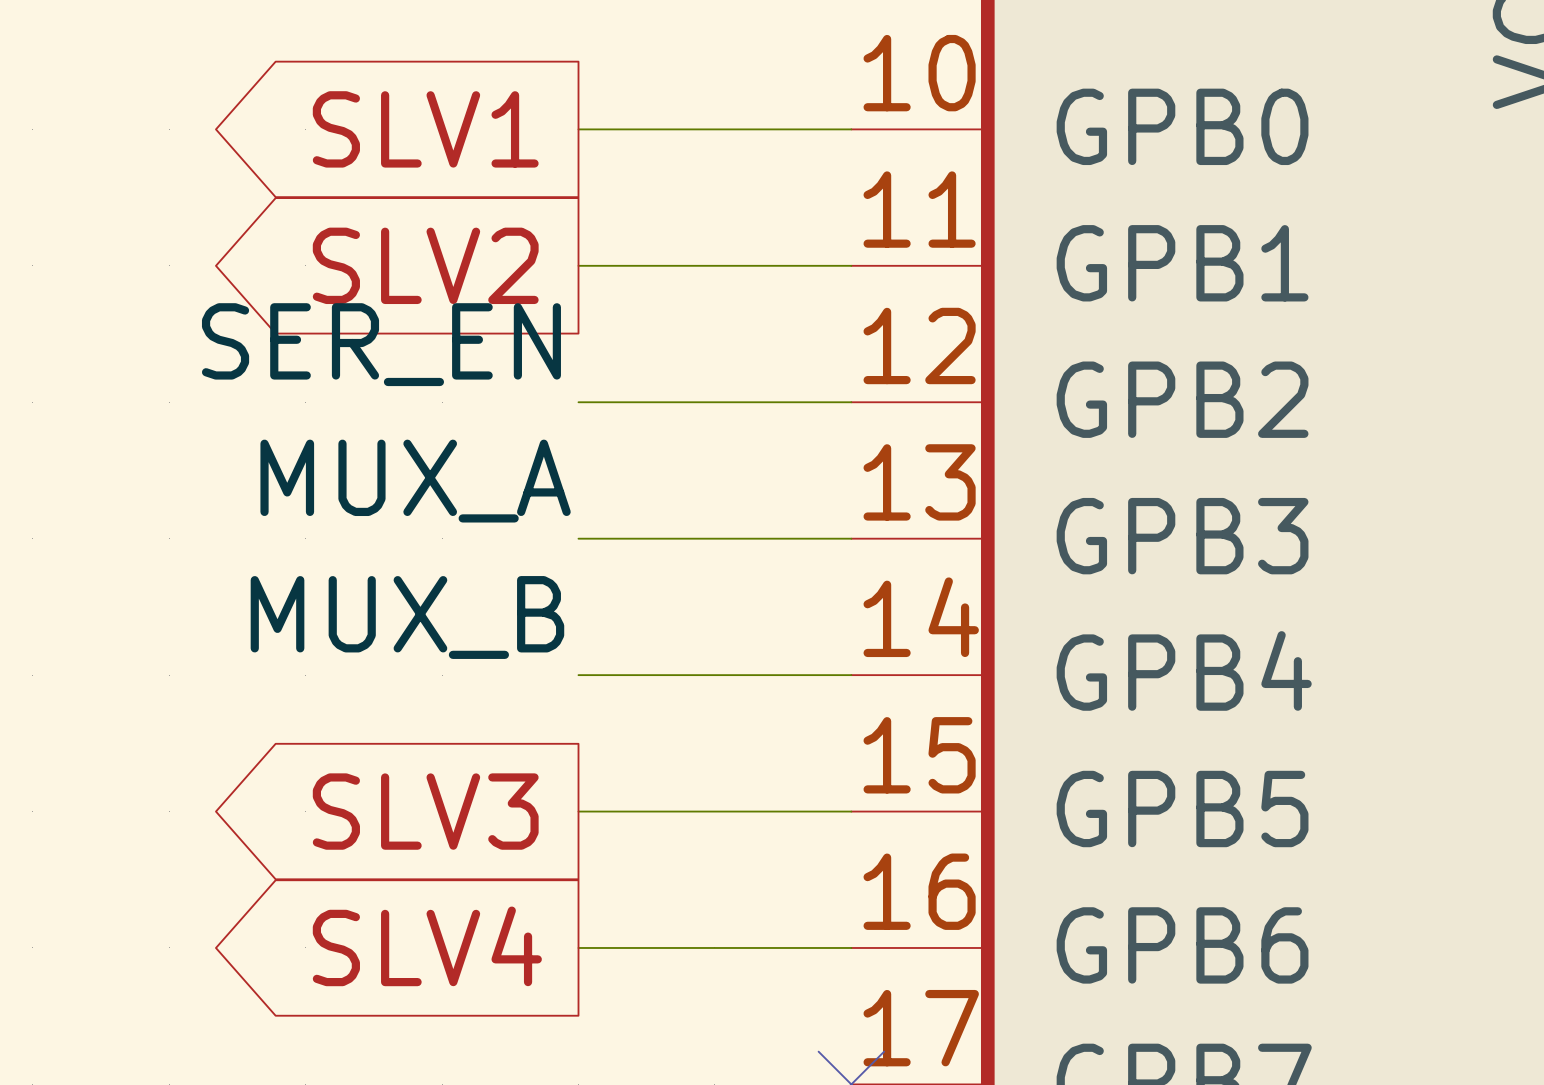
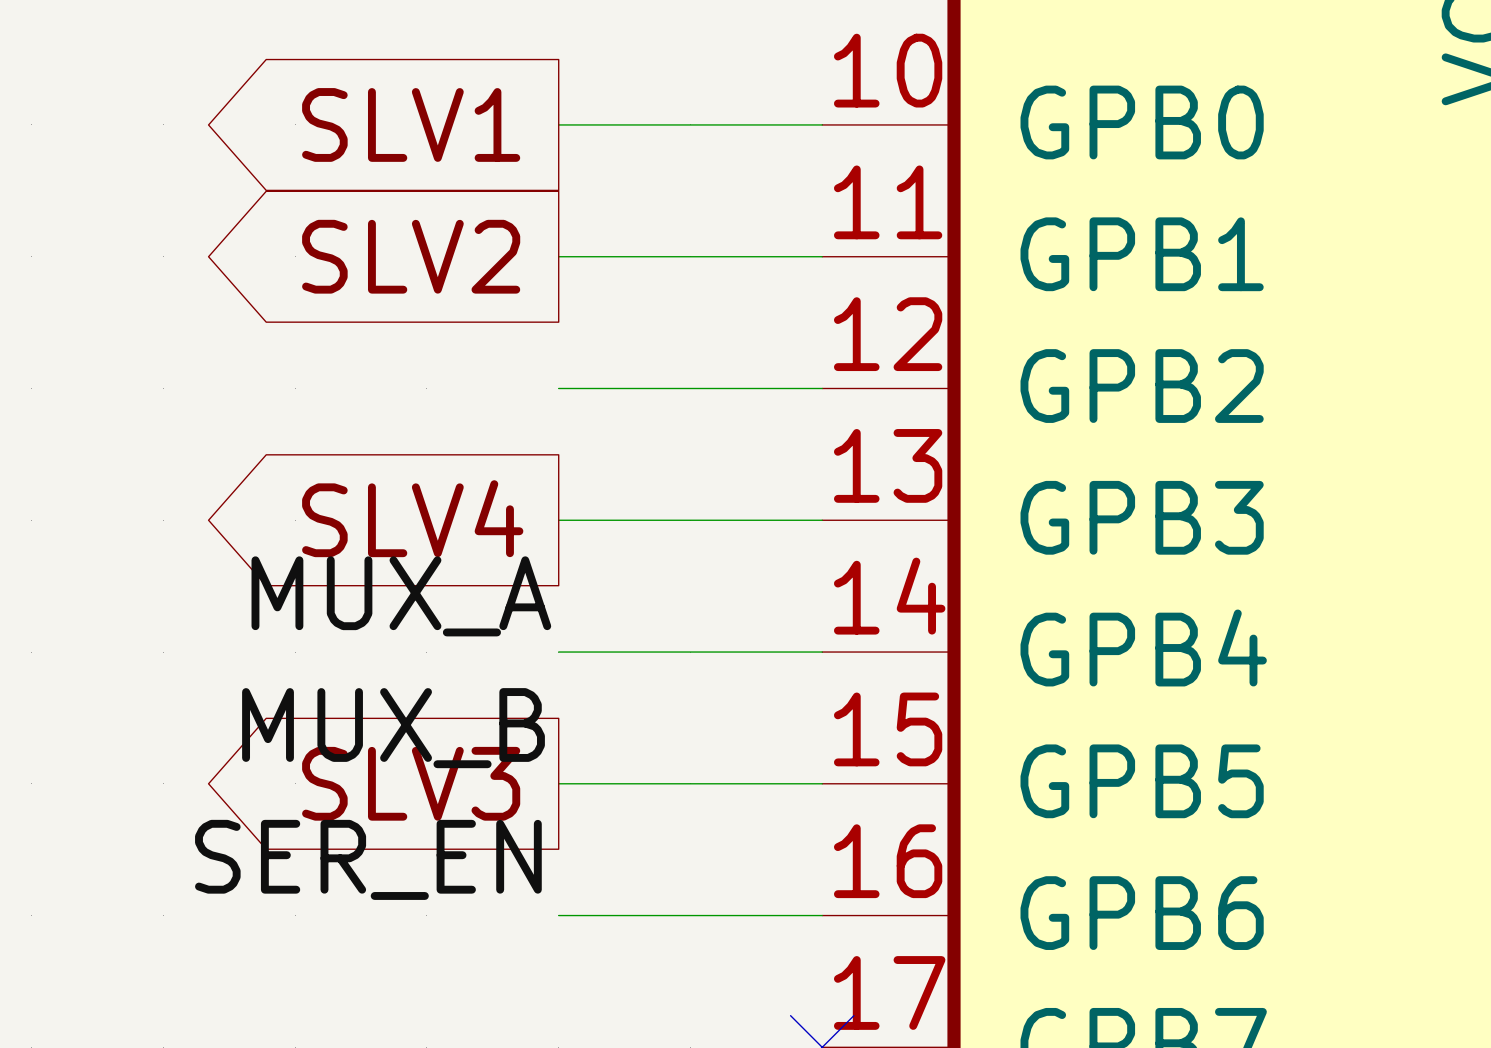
label position: SER_EN (381, 344) -> SER_EN (368, 859)
label: MUX_A (415, 481) -> none
label: MUX_B (407, 617) -> MUX_A (401, 596)
label: none -> MUX_B (393, 728)
global label position: SLV4 (427, 946) -> SLV4 (412, 518)

